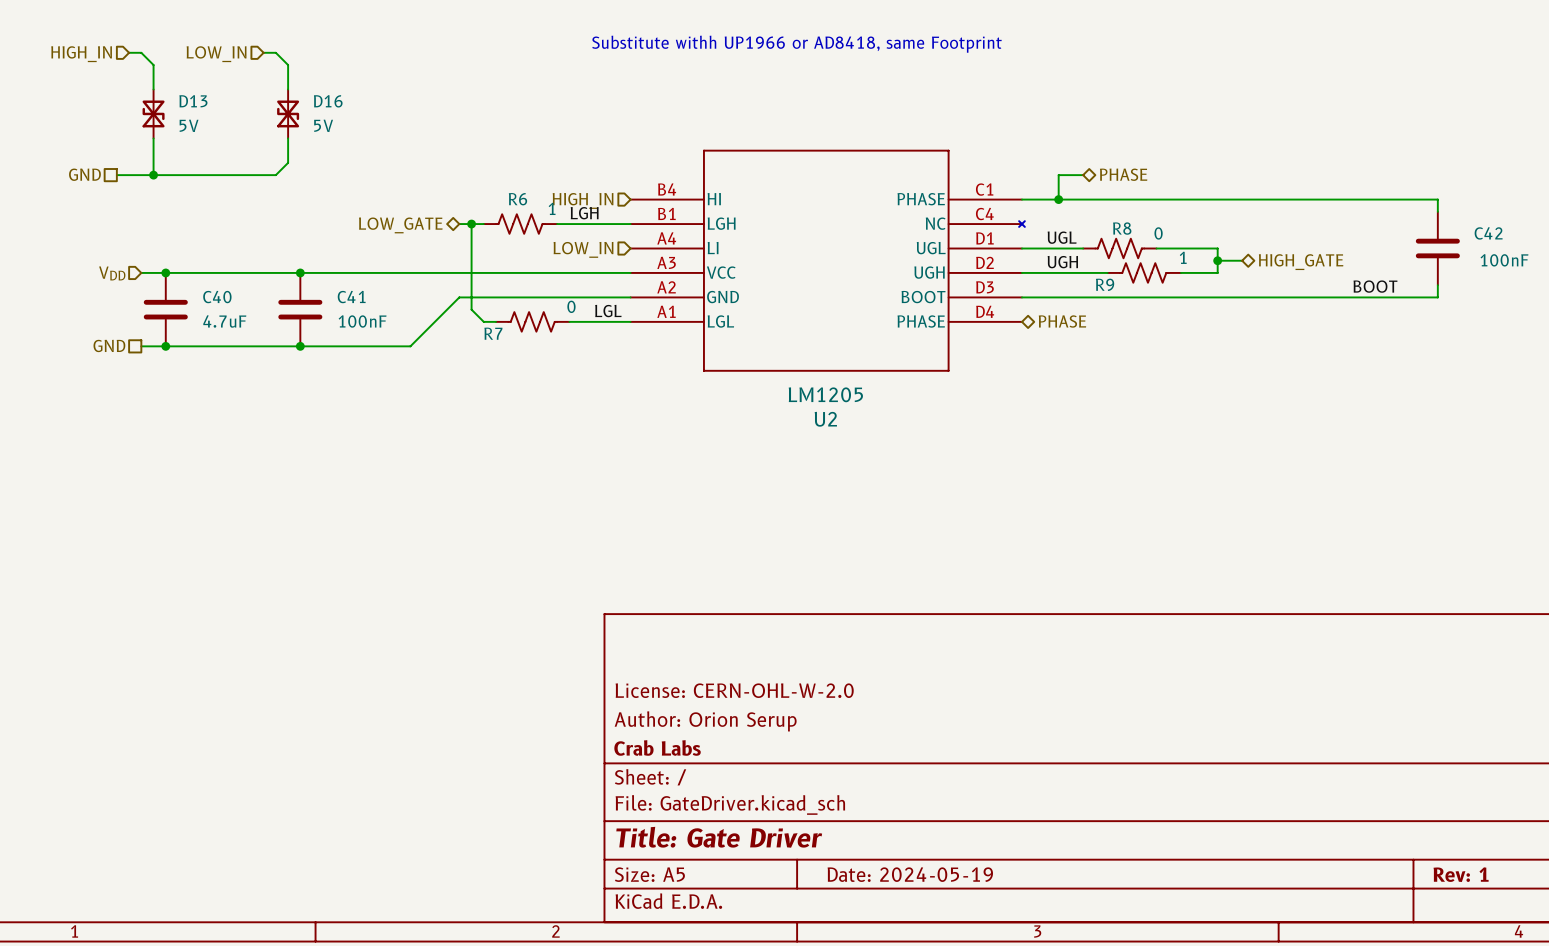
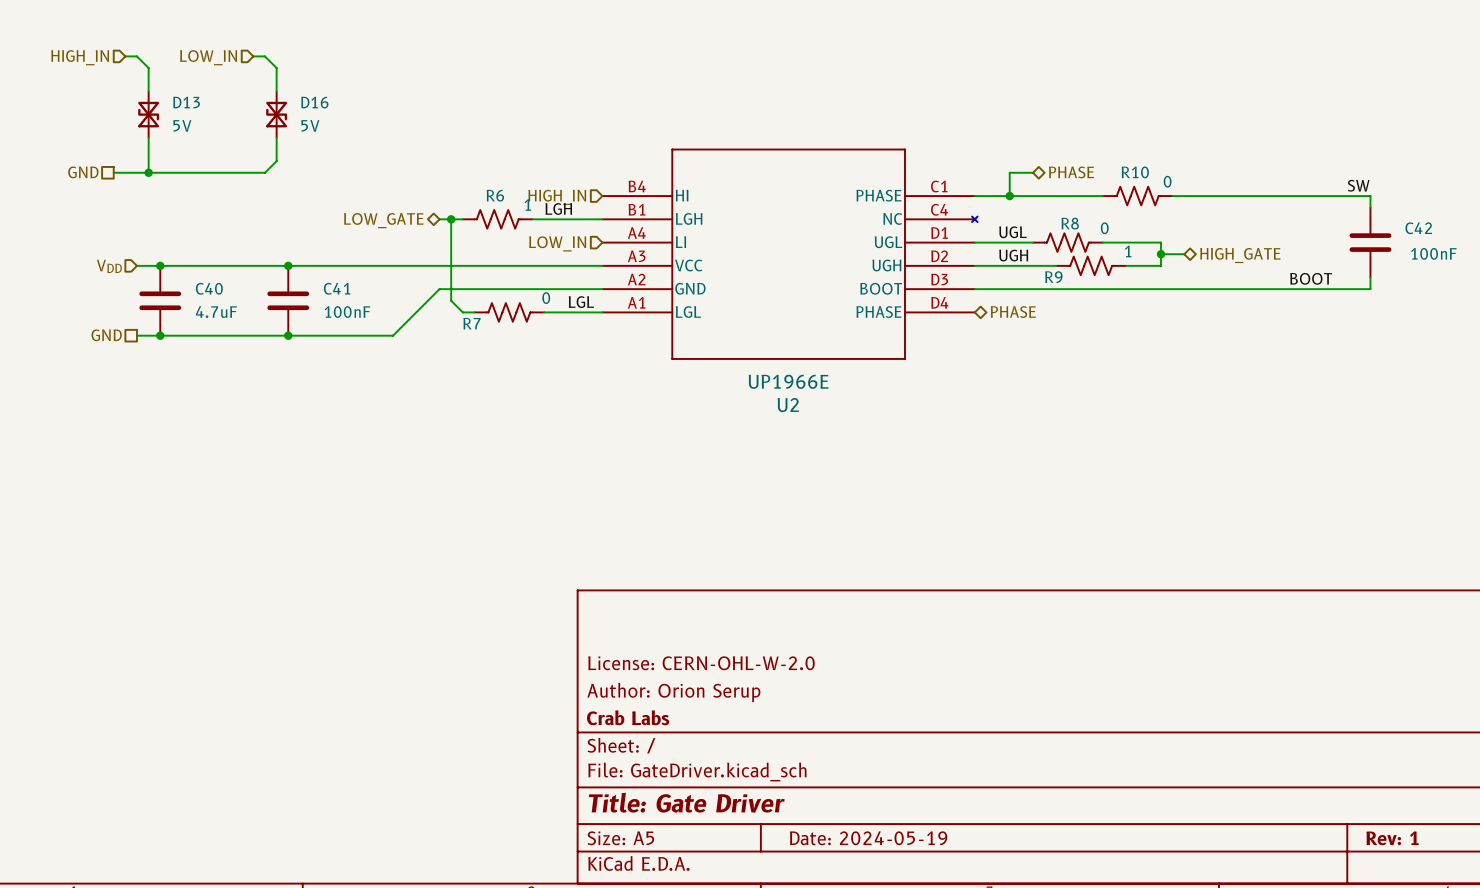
text: Substitute withh UP1966 or AD8418, same Footprint (796, 44) -> none
label: none -> SW (1358, 185)
R10: none -> 0 (1137, 196)
U2 value: LM1205 (825, 394) -> UP1966E (788, 381)

